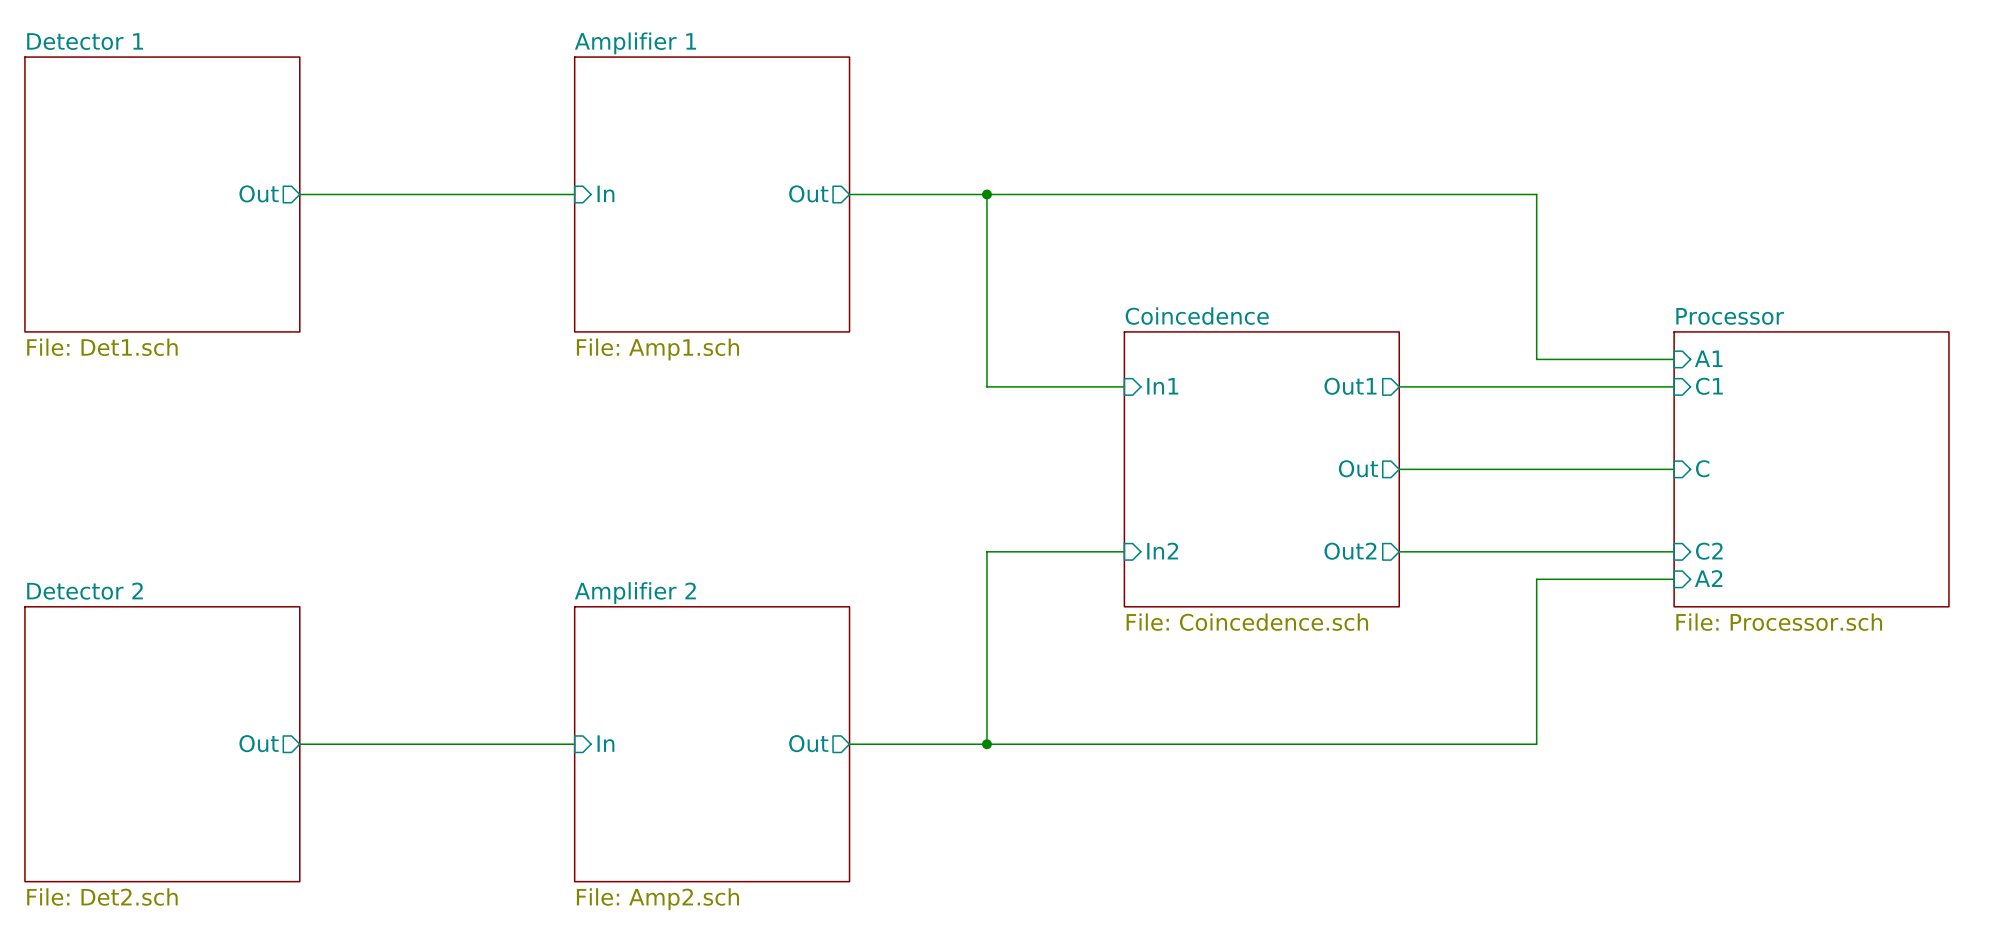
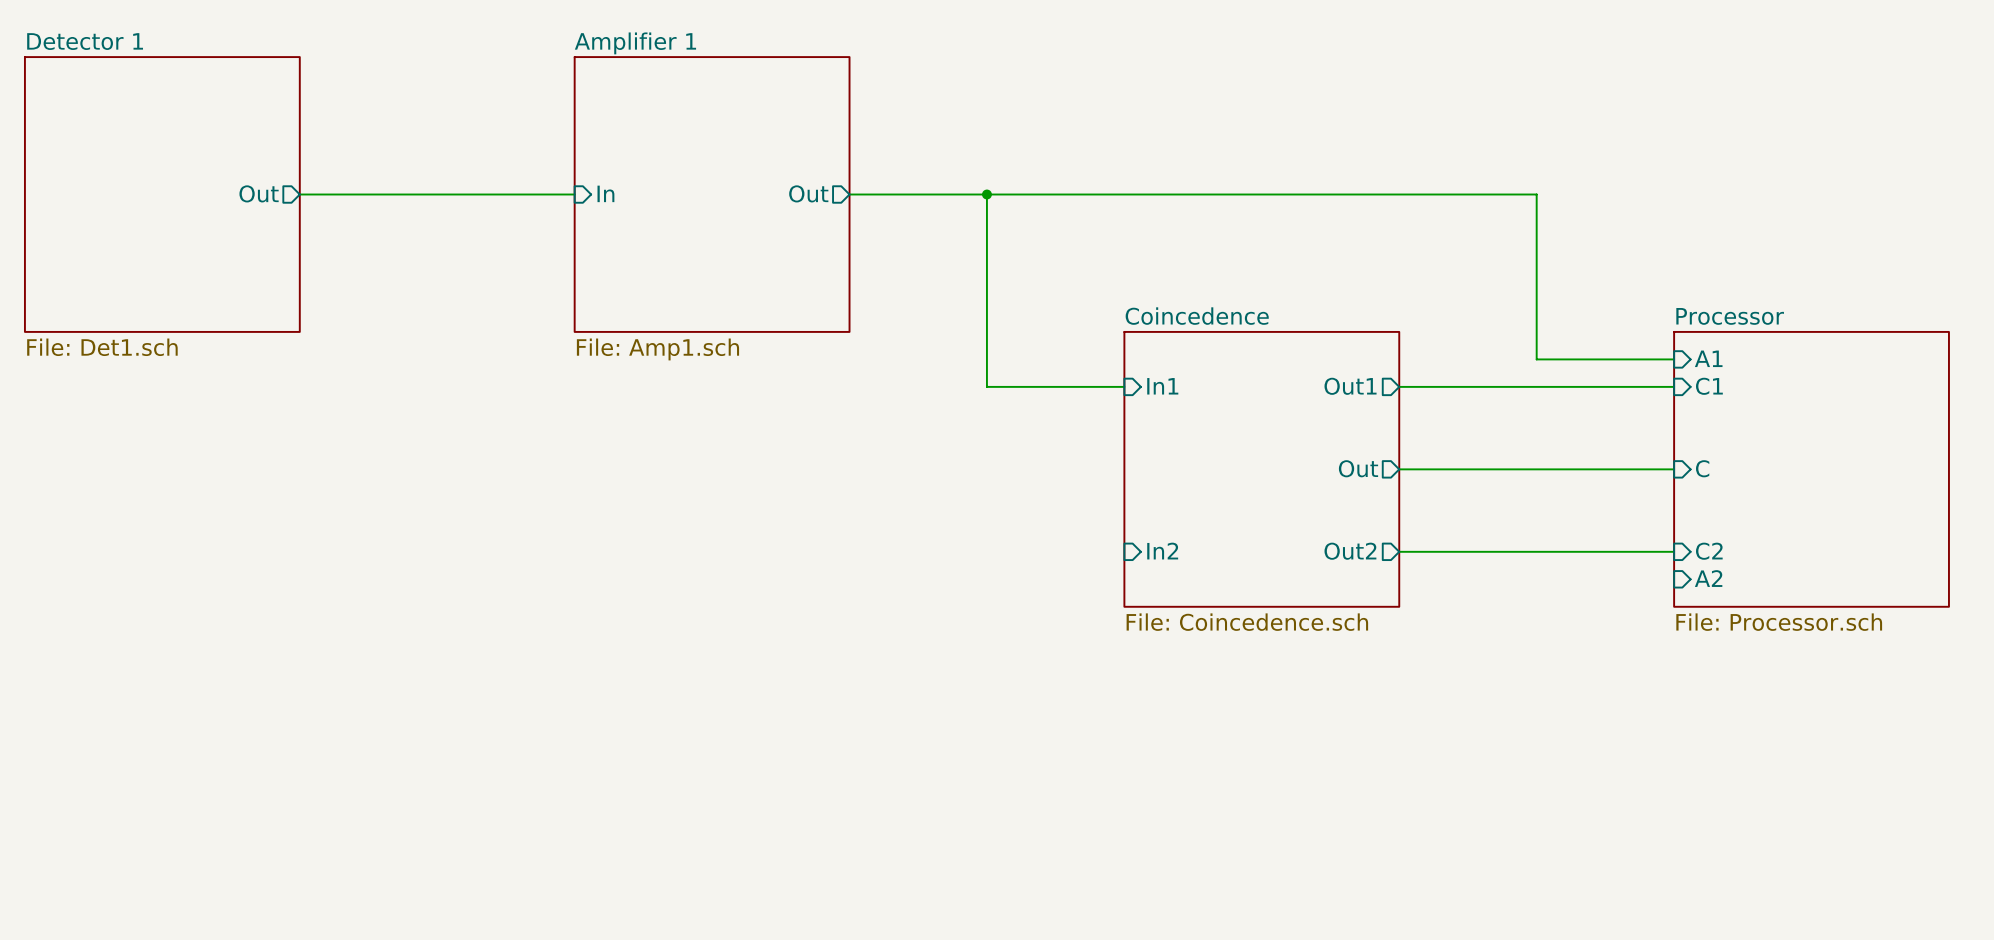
wire: (1124, 551) (986, 551) (986, 744) -> none
wire: (1674, 579) (1536, 579) (1536, 744) (849, 744) -> none
sheet pin: Out (259, 743) -> none
sheet pin: In (605, 743) -> none
sheet pin: Out (808, 743) -> none
sheet Detector 2: File: Det2.sch (162, 744) -> none
wire: (299, 744) (574, 744) -> none
sheet Amplifier 2: File: Amp2.sch (712, 744) -> none
junction: (986, 744) -> none

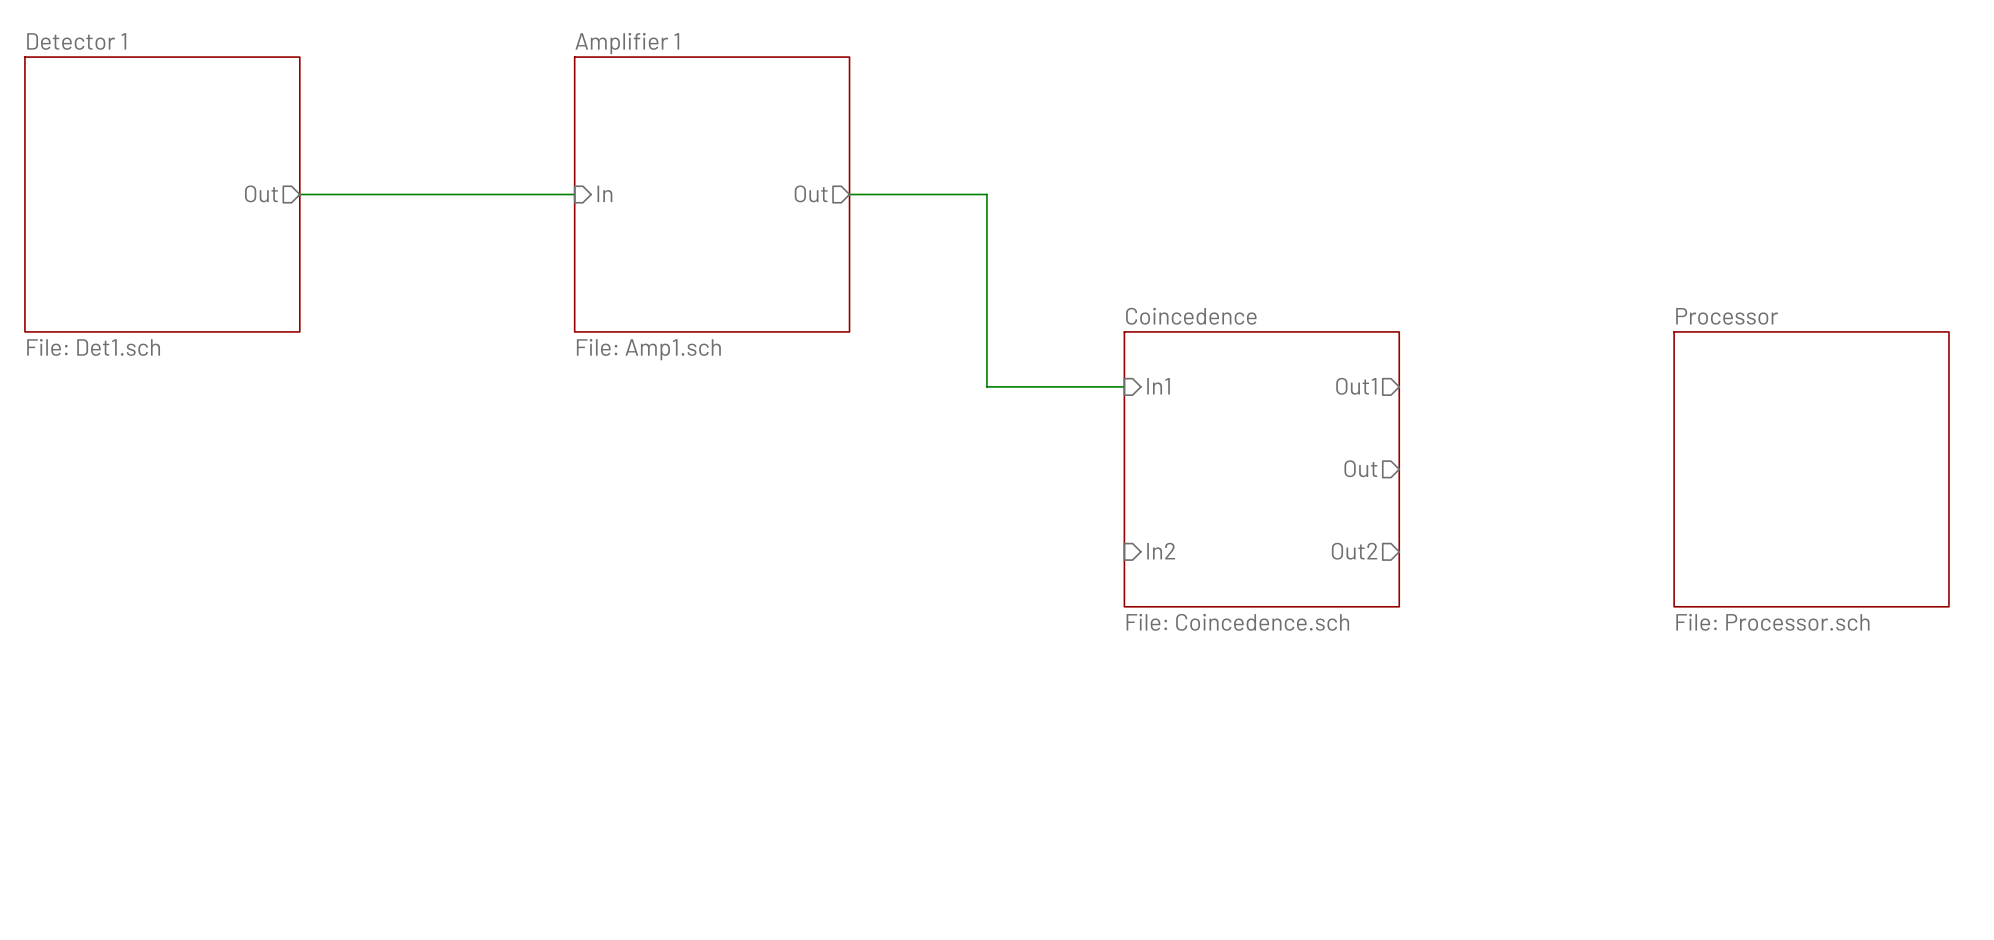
wire: (986, 194) (1536, 194) (1536, 359) (1674, 359) -> none
junction: (986, 194) -> none
sheet pin: A1 (1708, 358) -> none
wire: (1399, 386) (1674, 386) -> none
sheet pin: C1 (1709, 386) -> none
sheet pin: C (1702, 468) -> none
wire: (1399, 469) (1674, 469) -> none
wire: (1399, 551) (1674, 551) -> none
sheet pin: C2 (1709, 551) -> none
sheet pin: A2 (1708, 578) -> none

